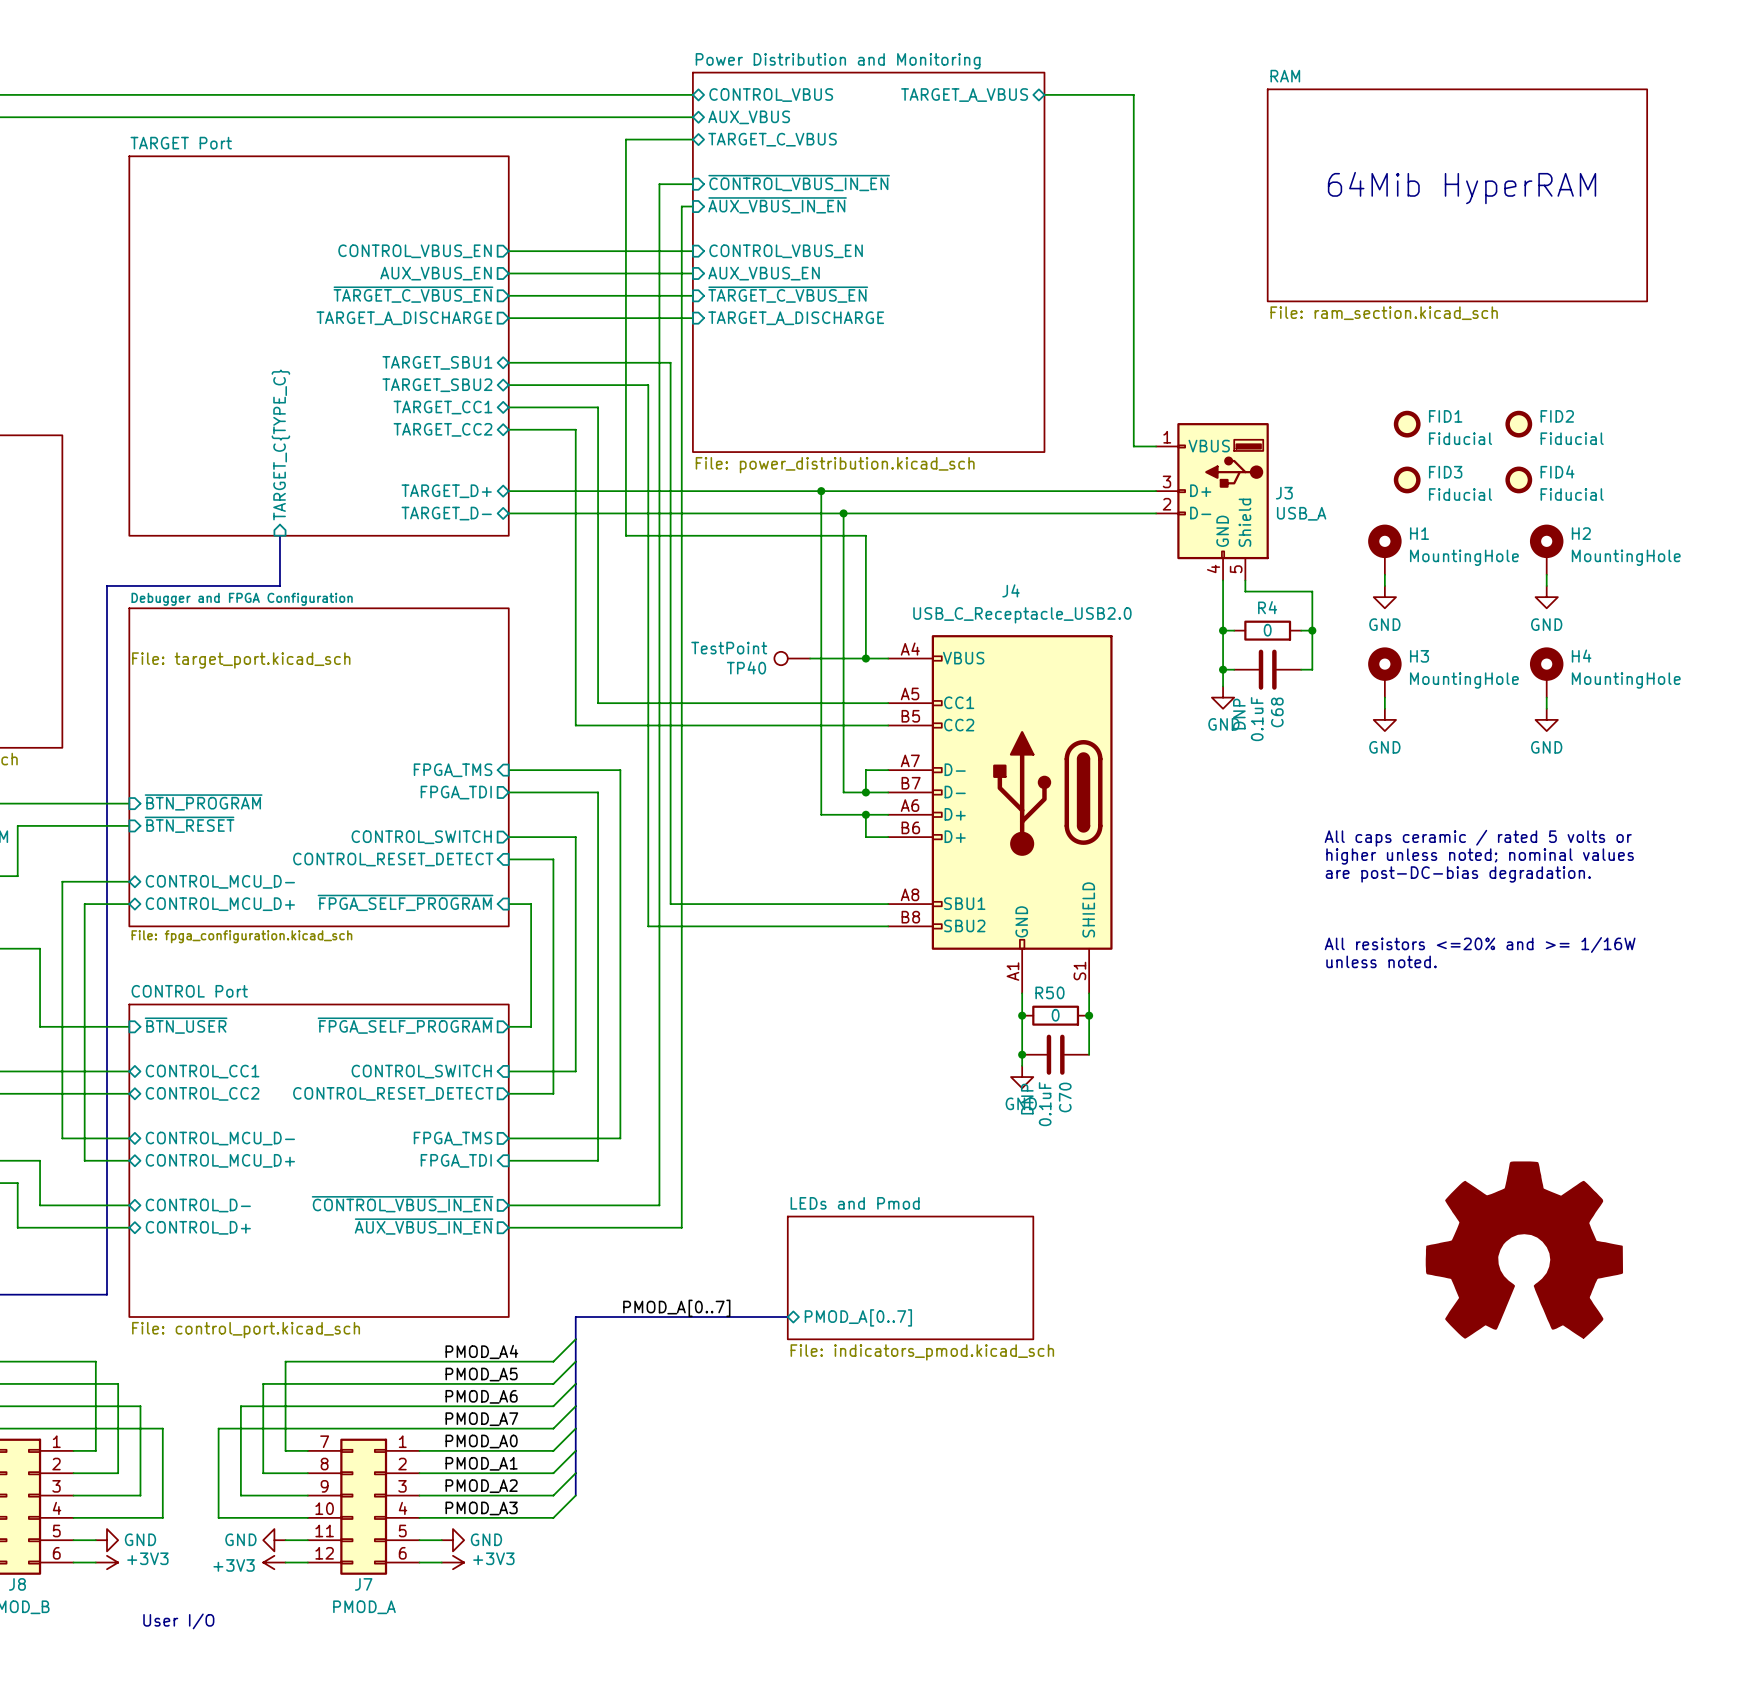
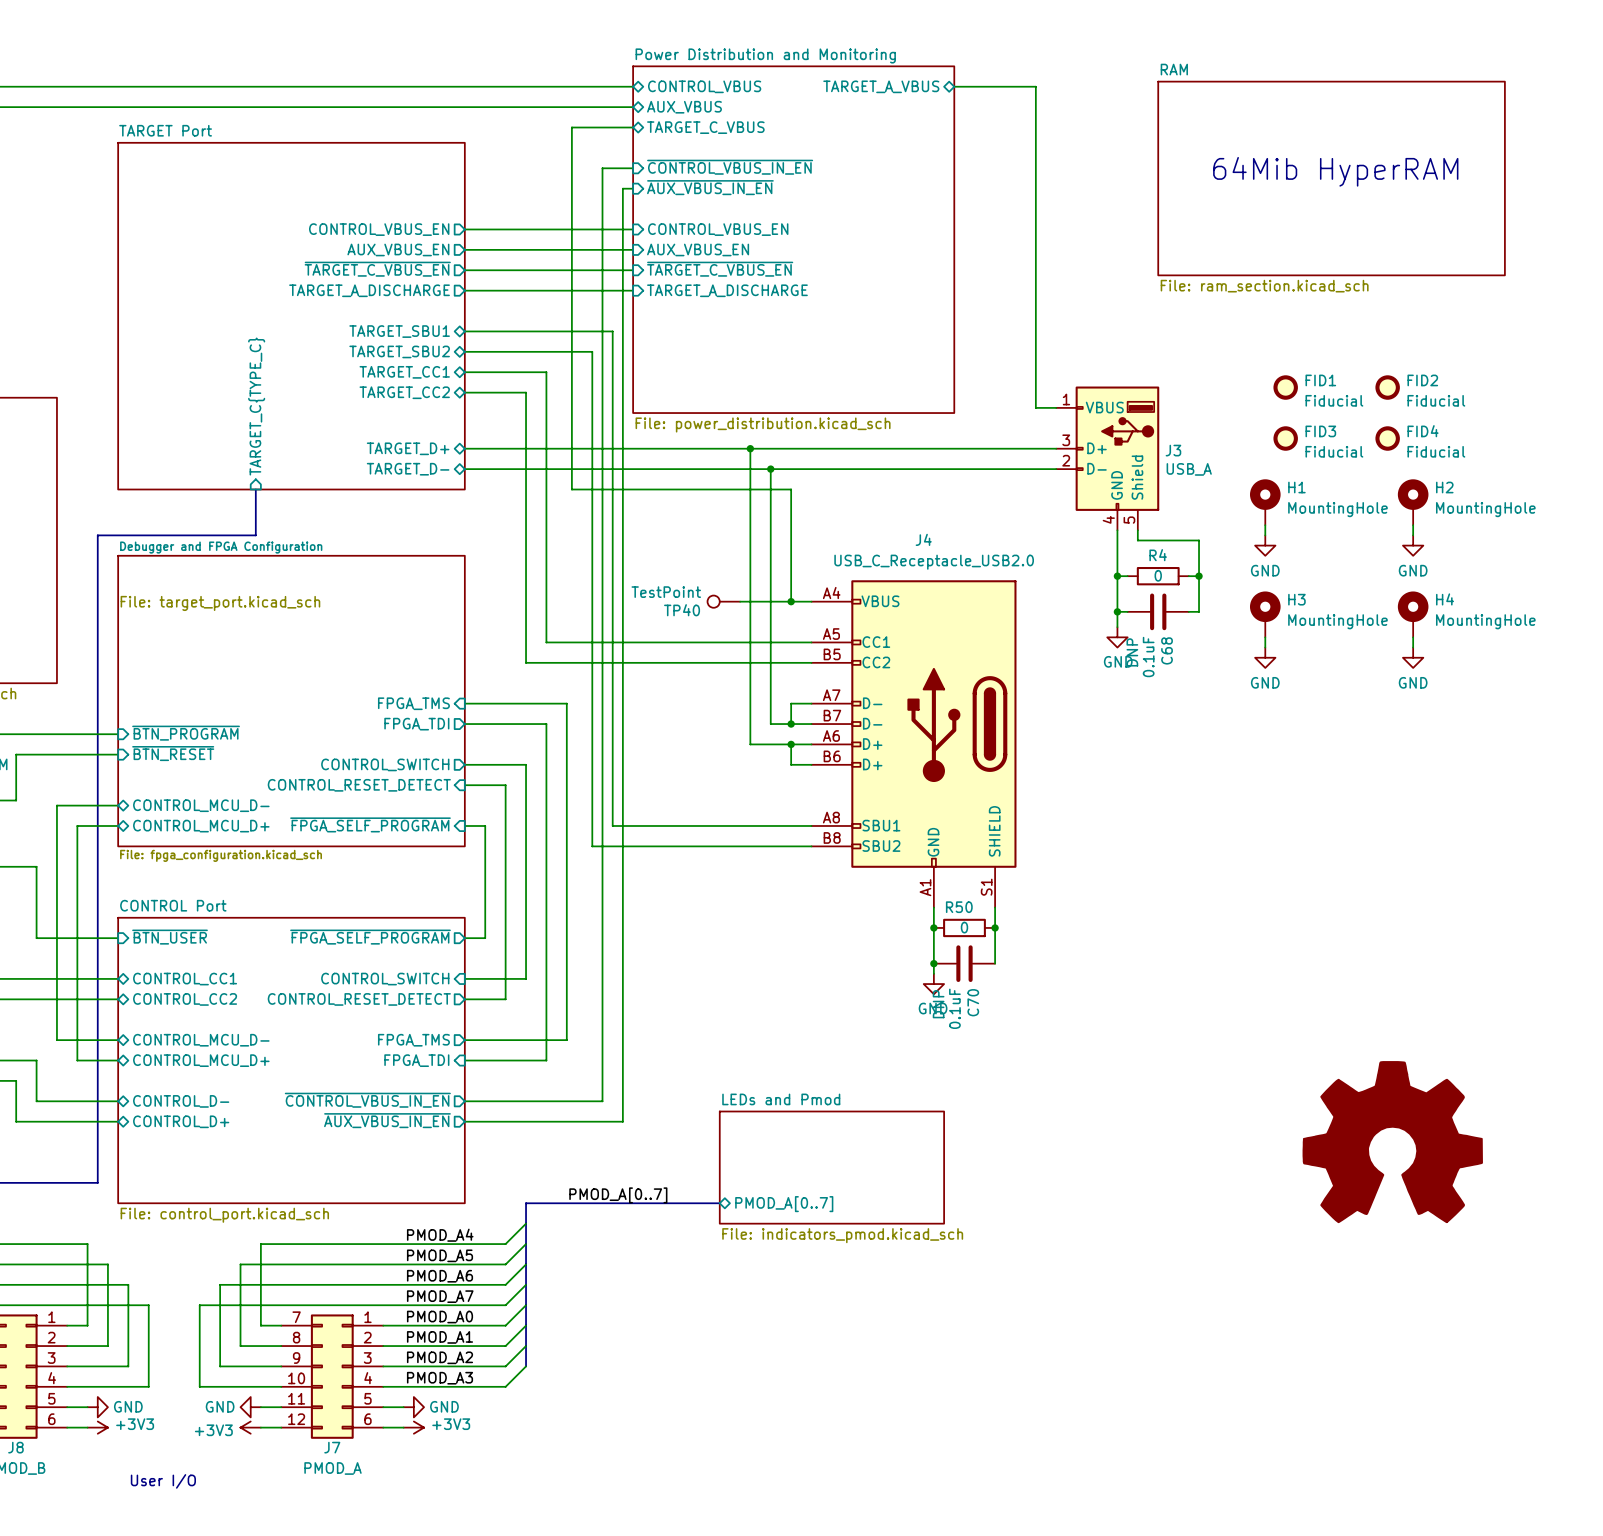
text: All caps ceramic / rated 5 volts or (1478, 838) -> none
text: higher unless noted; nominal values (1480, 856) -> none
text: are post-DC-bias degradation. (1458, 874) -> none
text: All resistors <=20% and >= 1/16W (1480, 944) -> none
text: unless noted. (1381, 961) -> none

